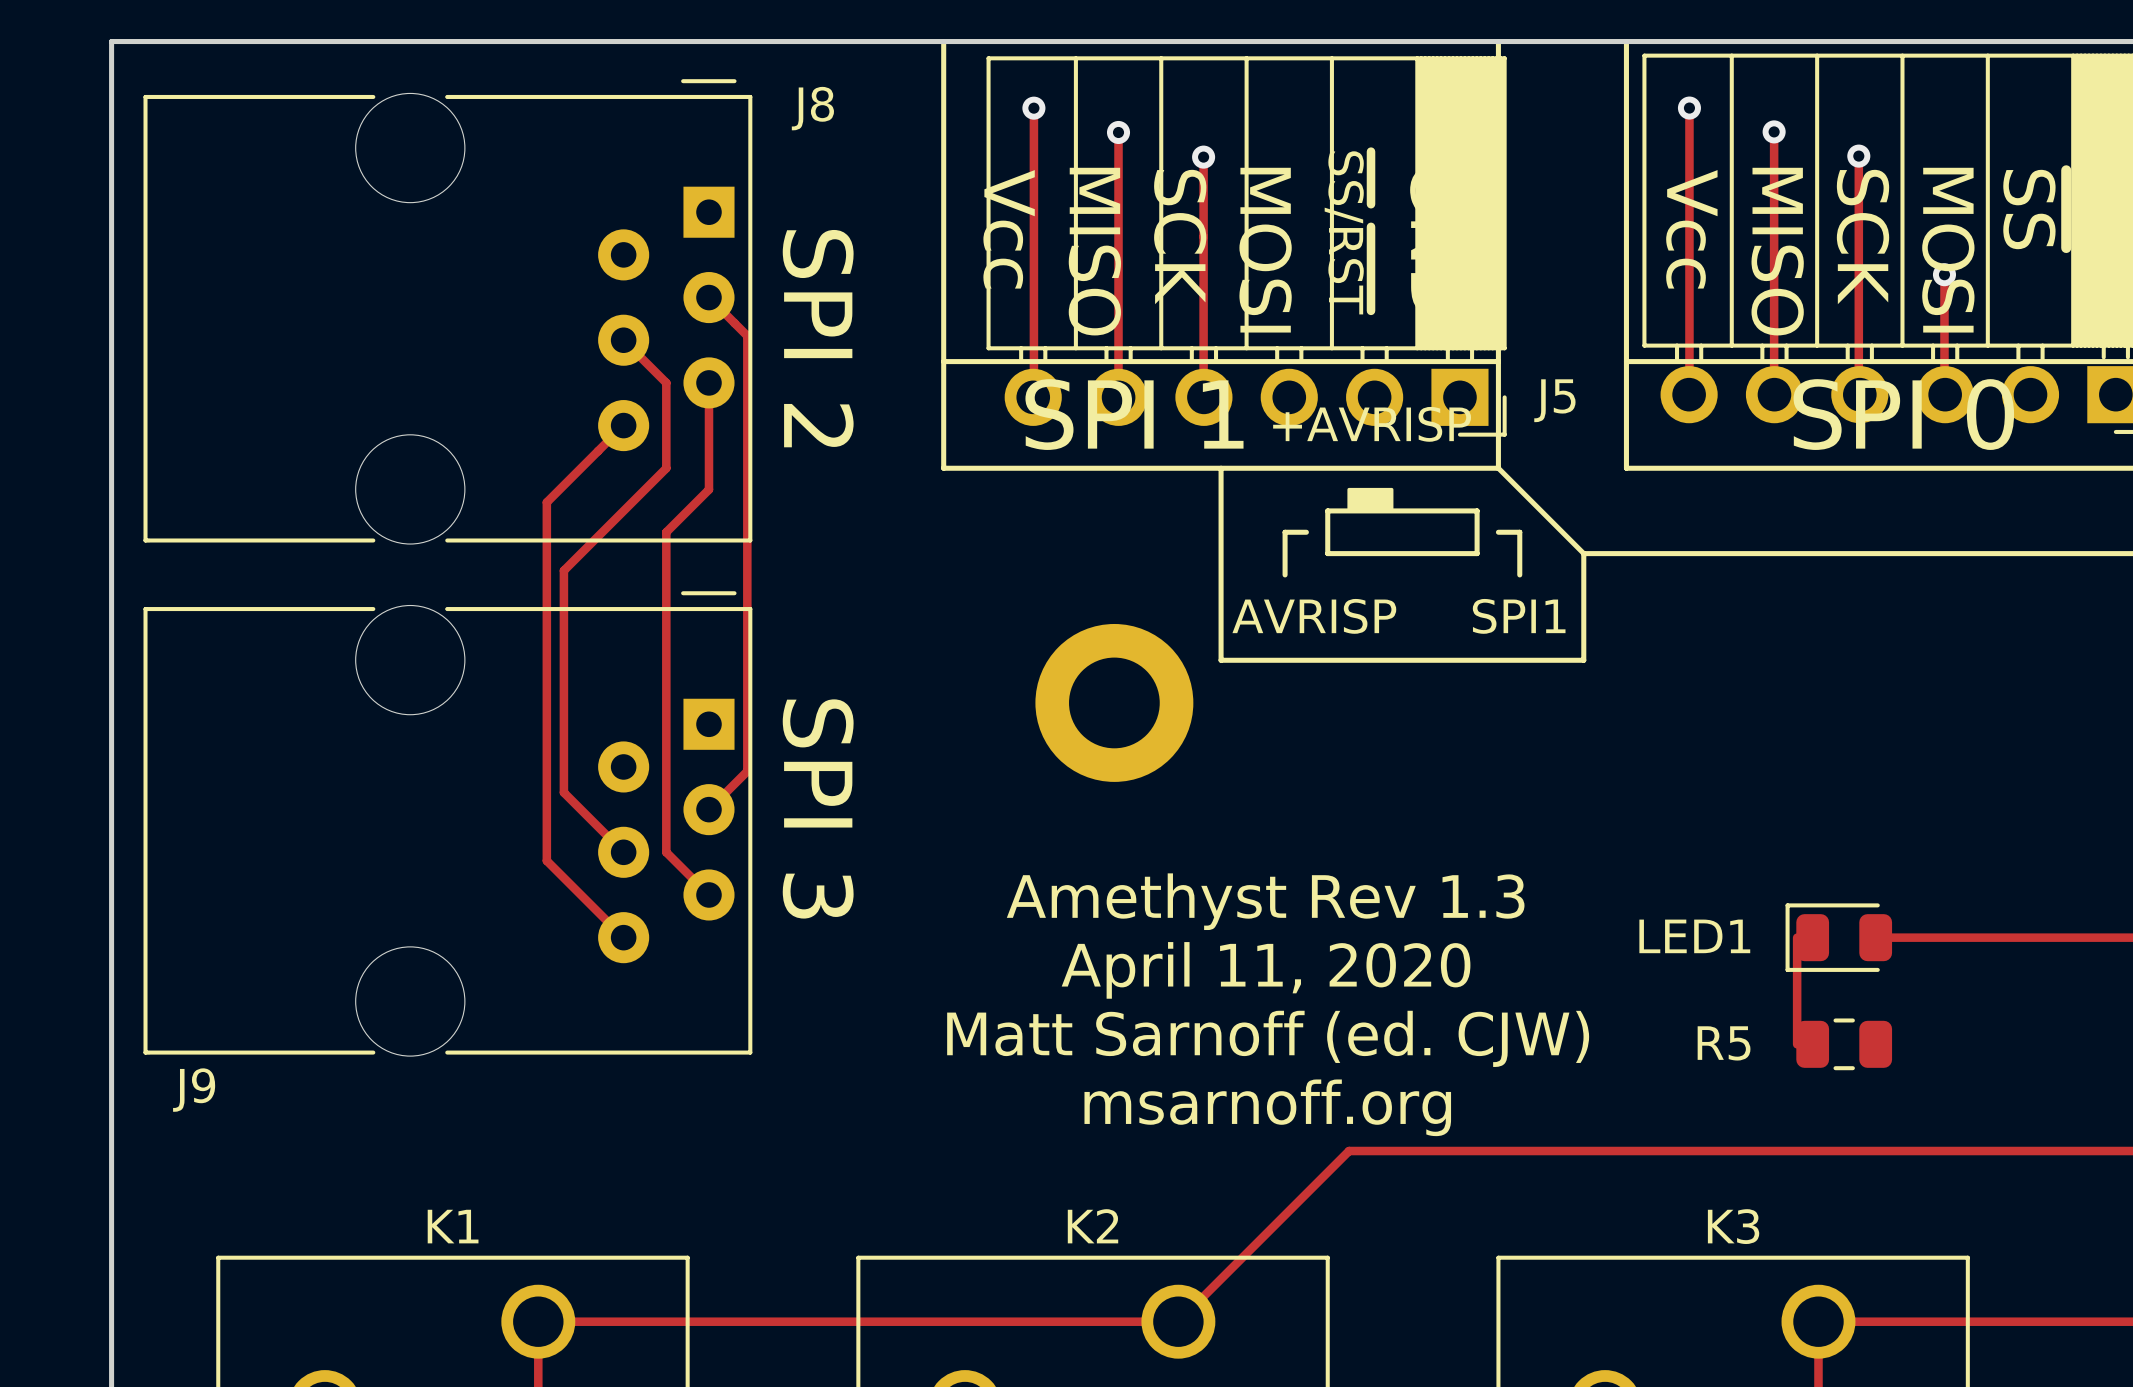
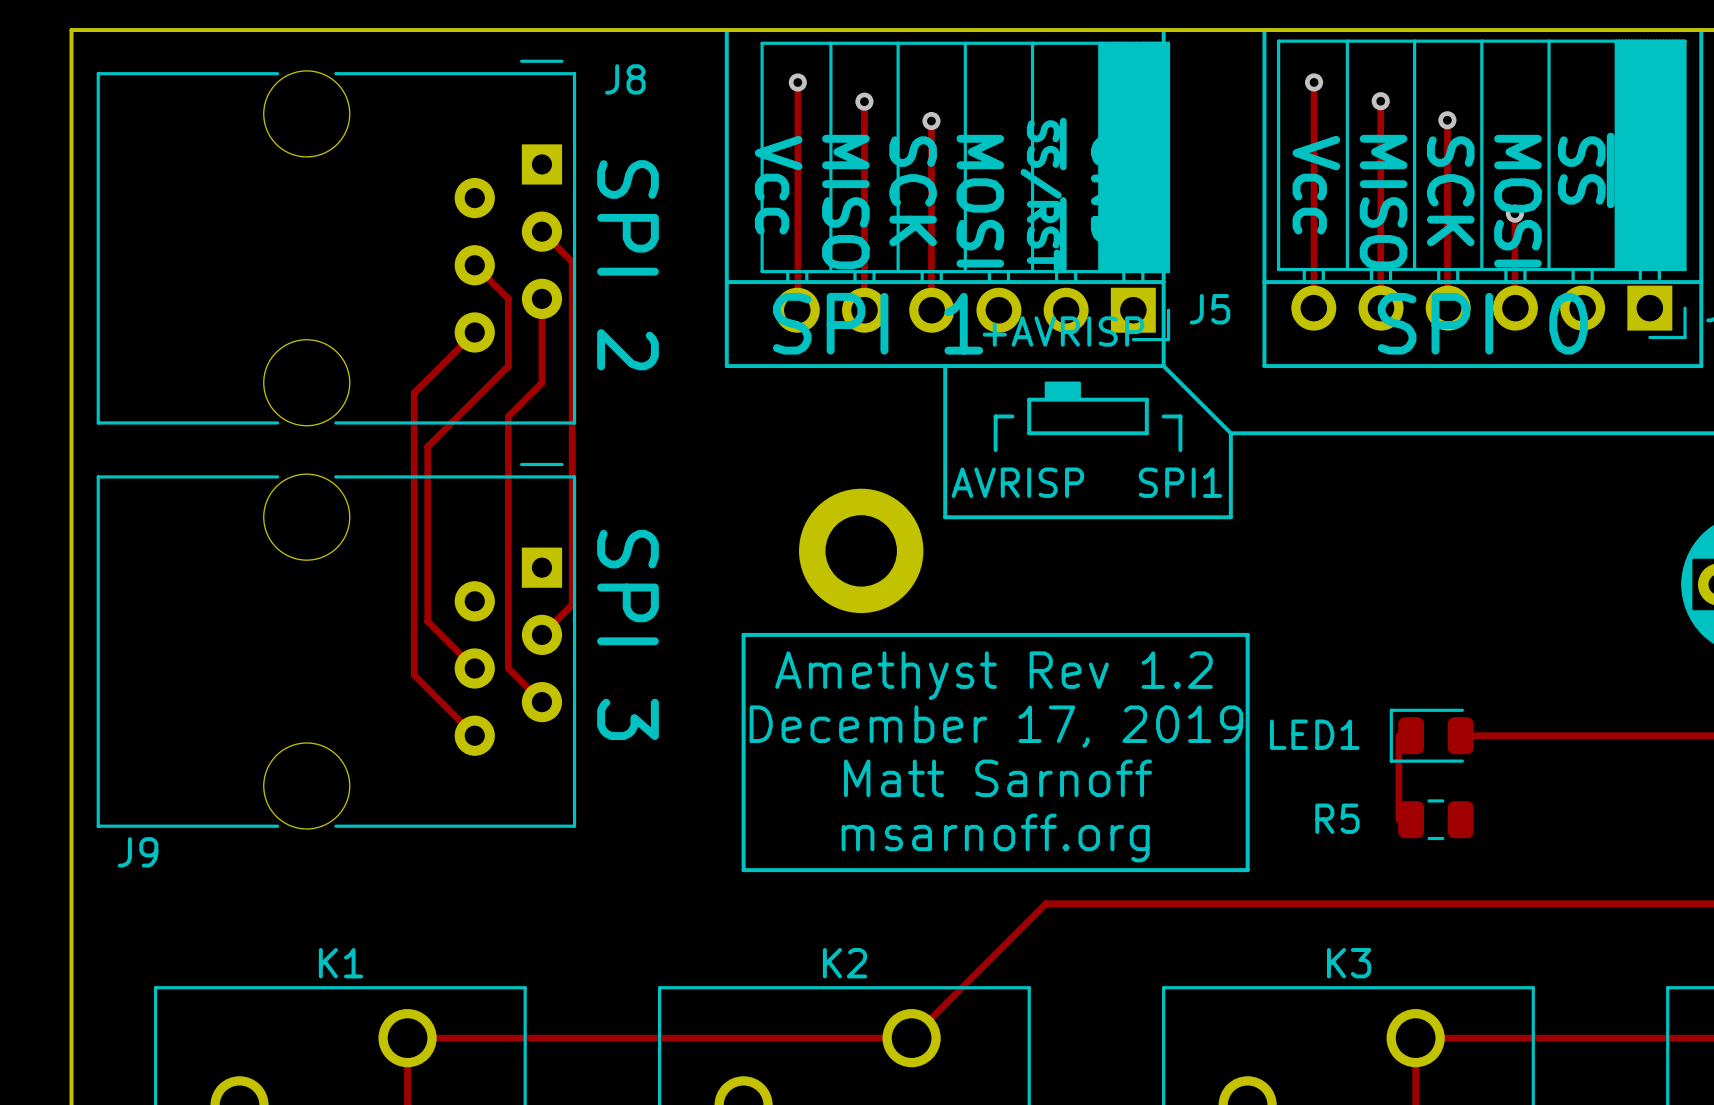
line: none -> (743, 634) (743, 870) (1247, 870) (1247, 634) (743, 634)
text: Amethyst Rev 1.3 (1265, 901) -> Amethyst Rev 1.2 (994, 675)
text: none -> December 17, 2019 (996, 726)
text: April 11, 2020 (1266, 970) -> none
text: Matt Sarnoff (ed. CJW) (1268, 1038) -> Matt Sarnoff (998, 778)
text position: msarnoff.org (1267, 1107) -> msarnoff.org (995, 838)

